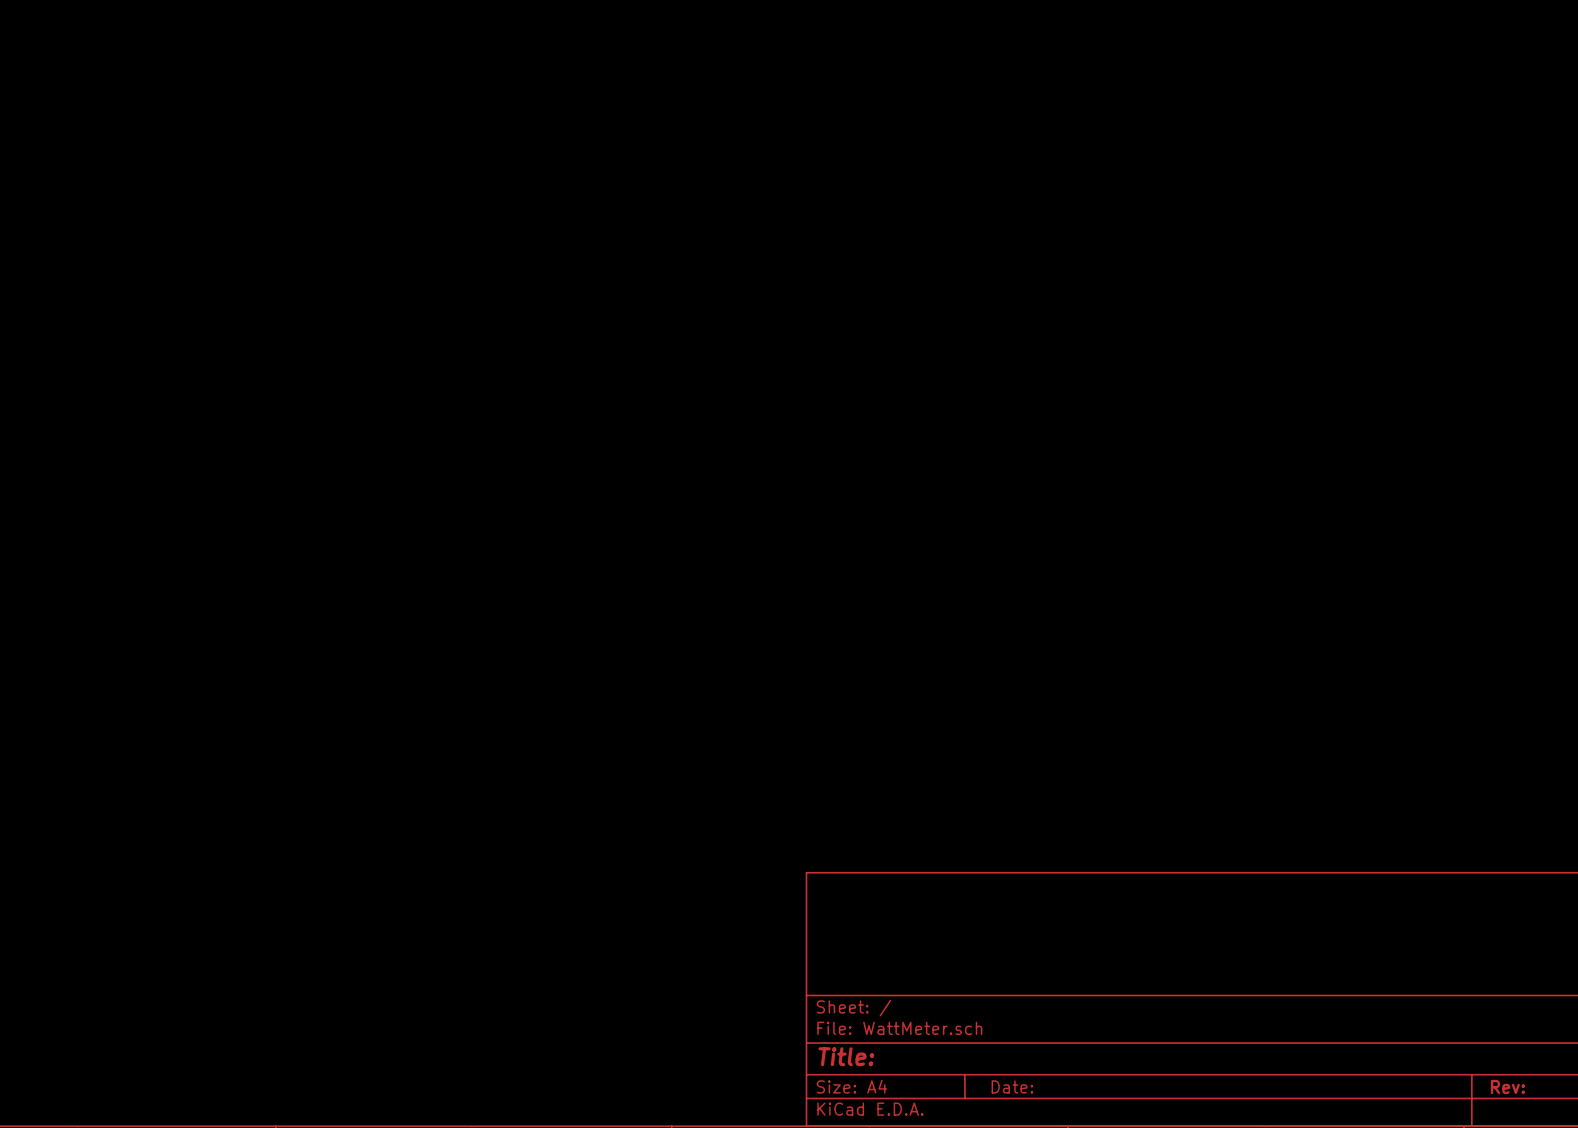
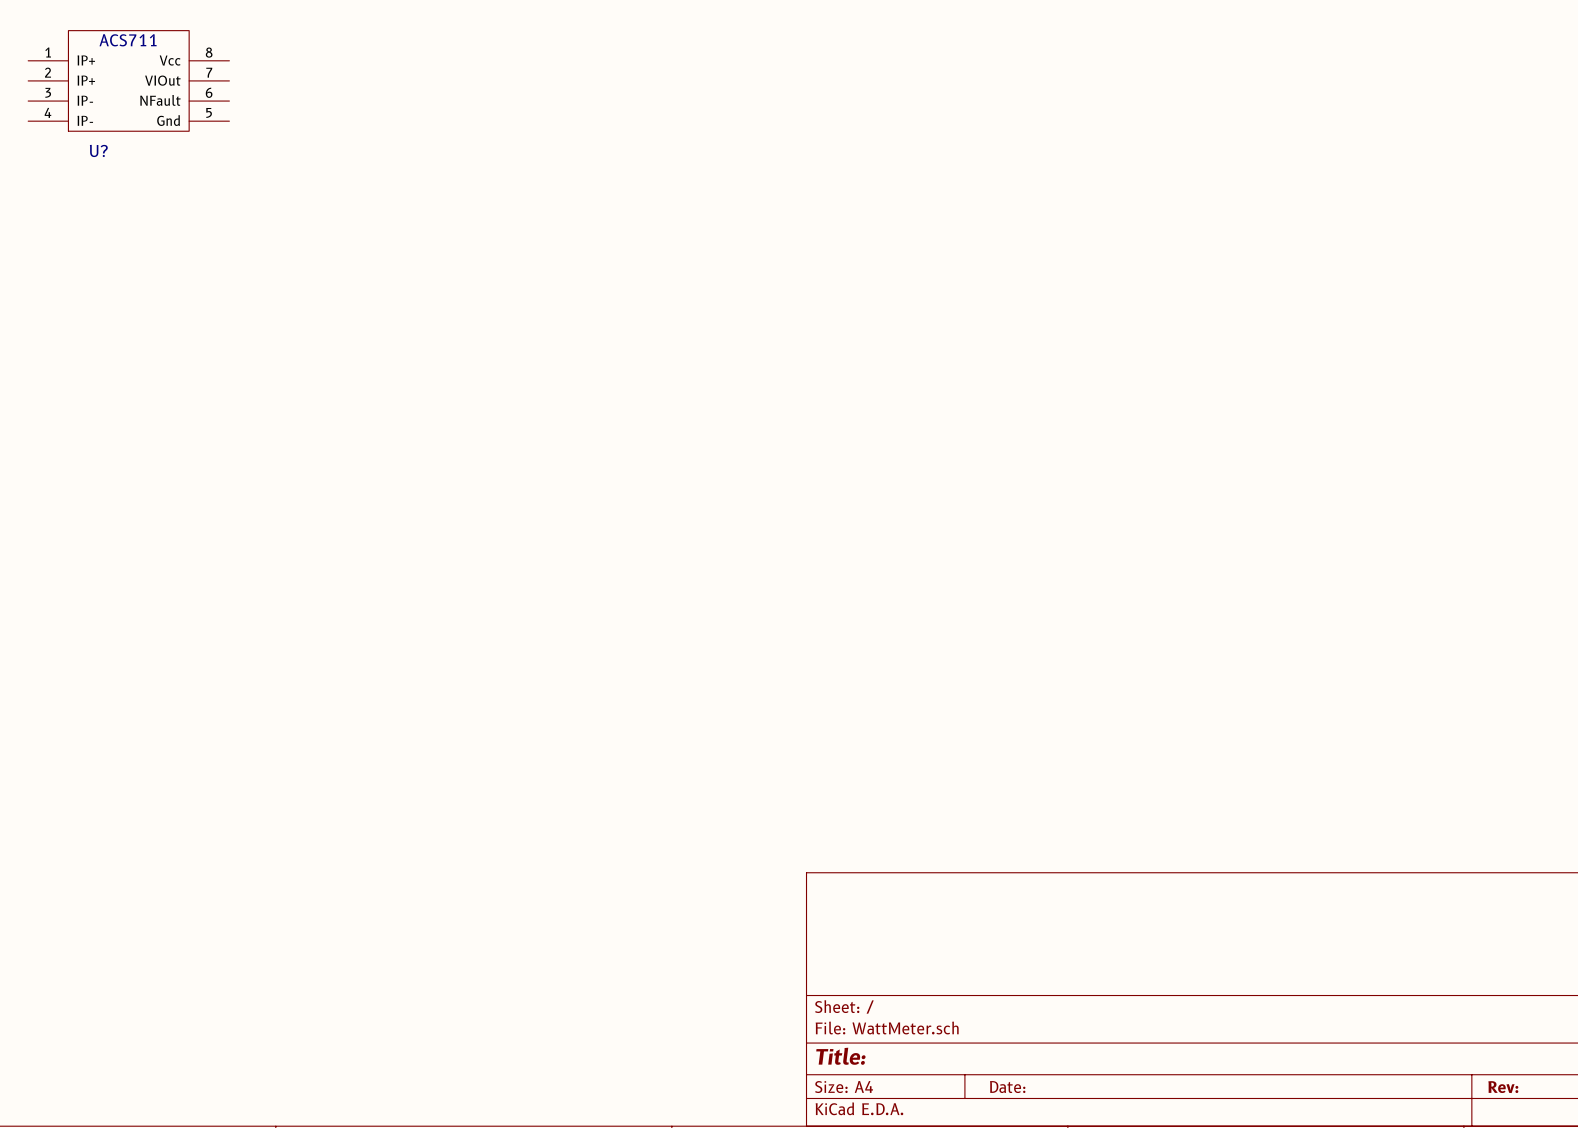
U?: none -> ACS711 (128, 80)

